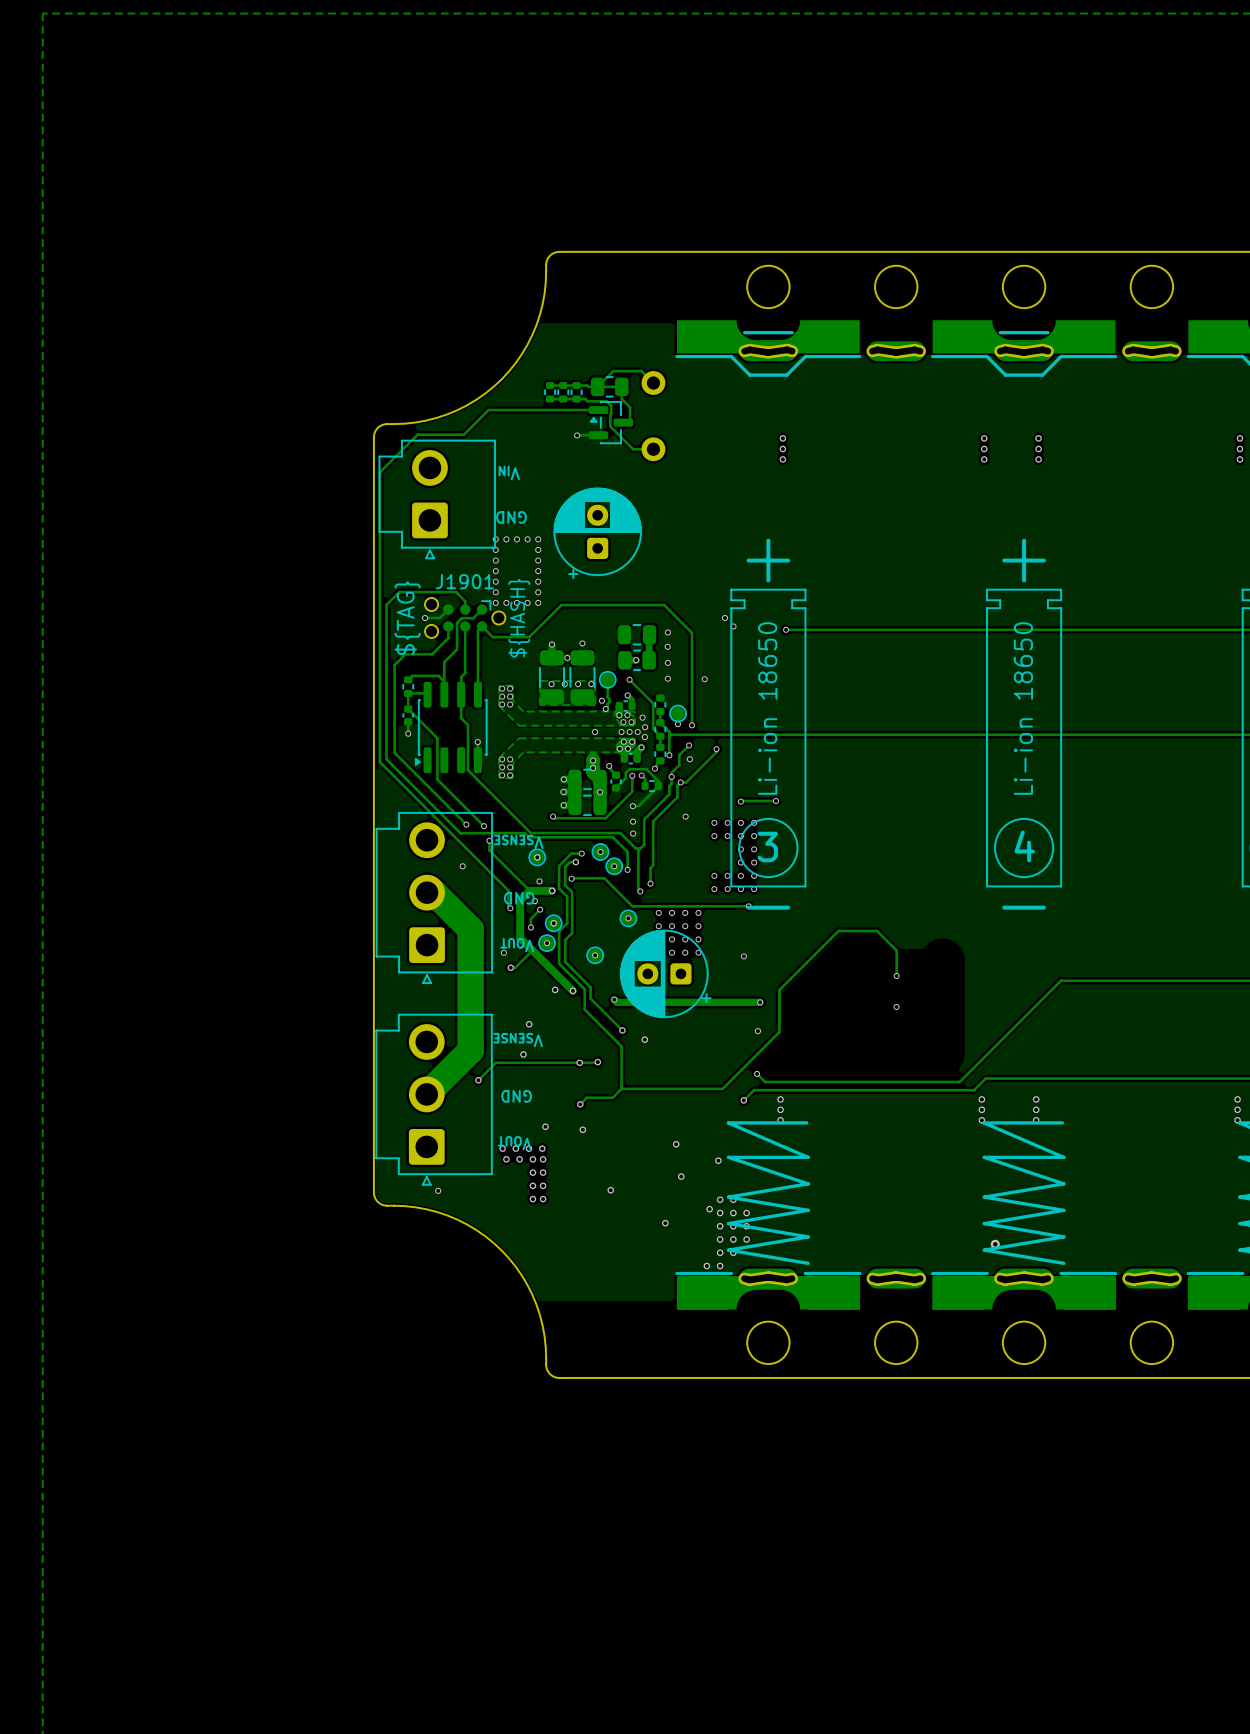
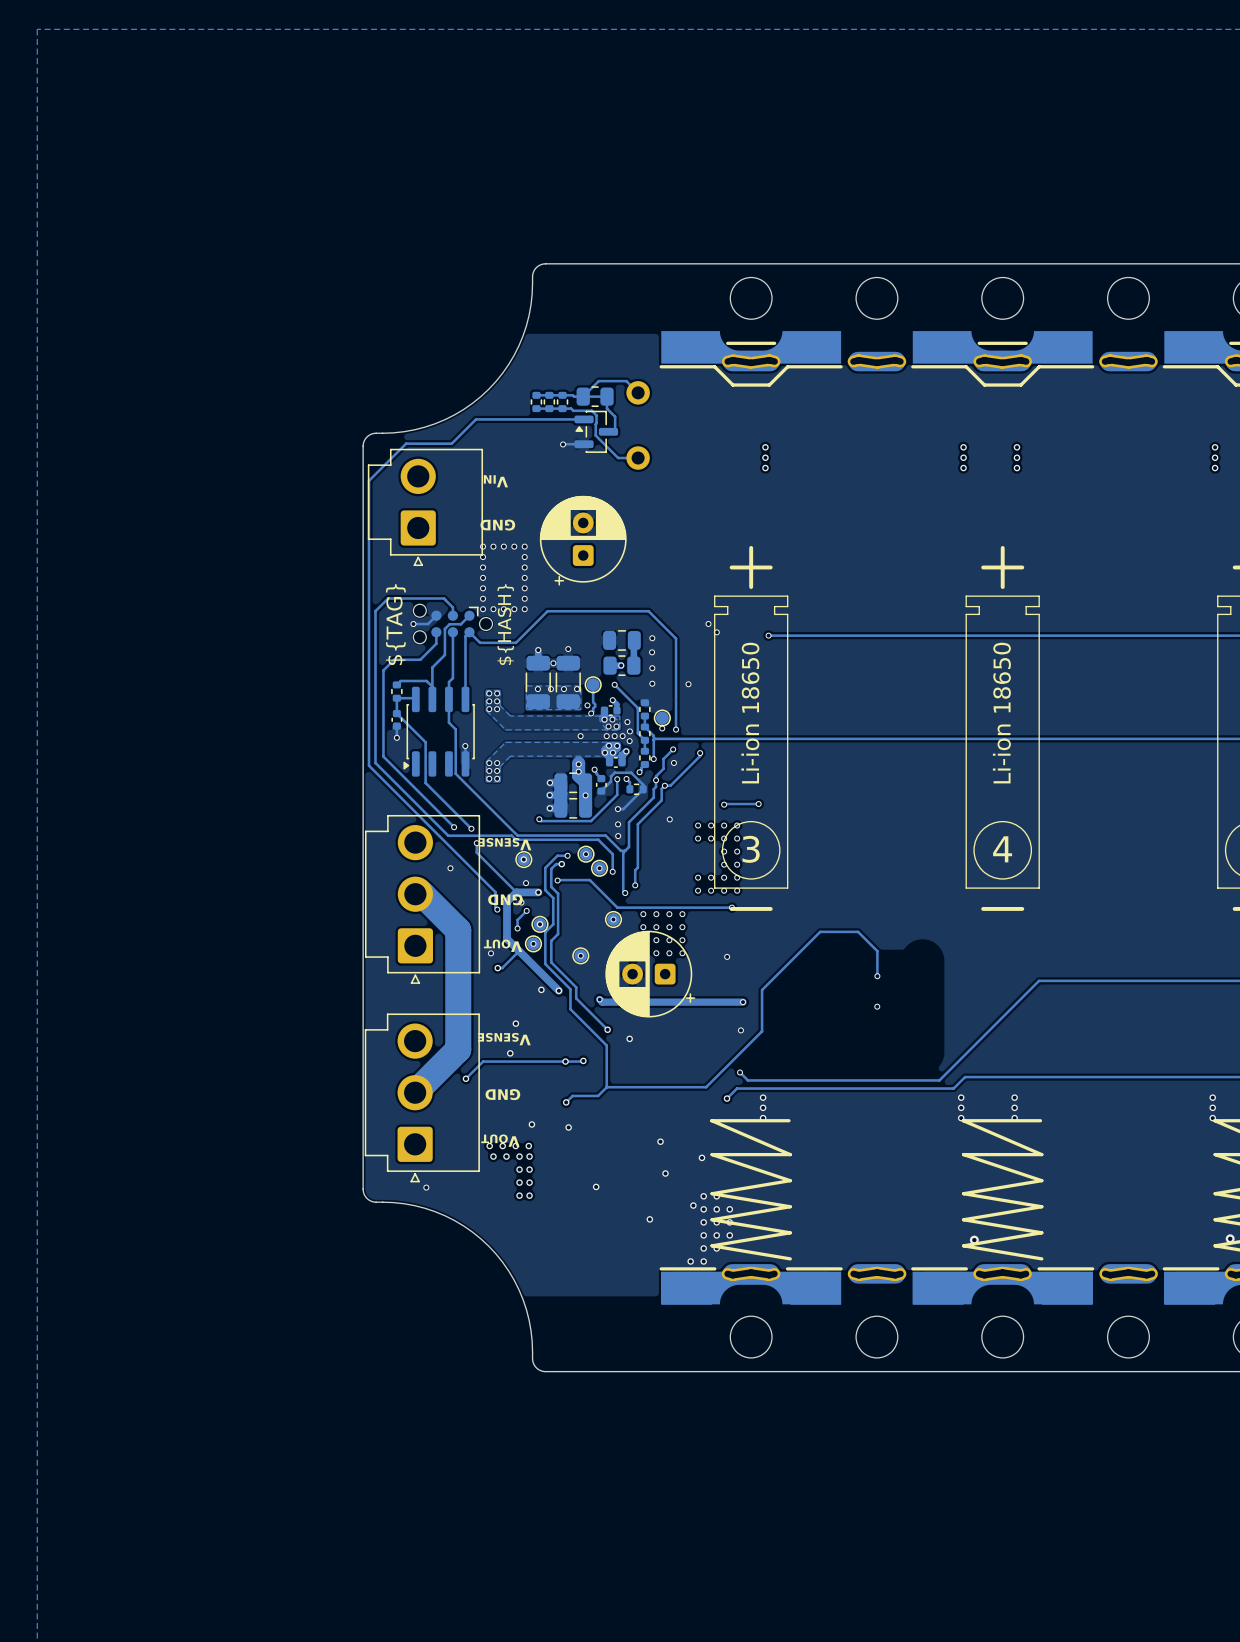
J1901 name: J1901 (464, 581) -> none

